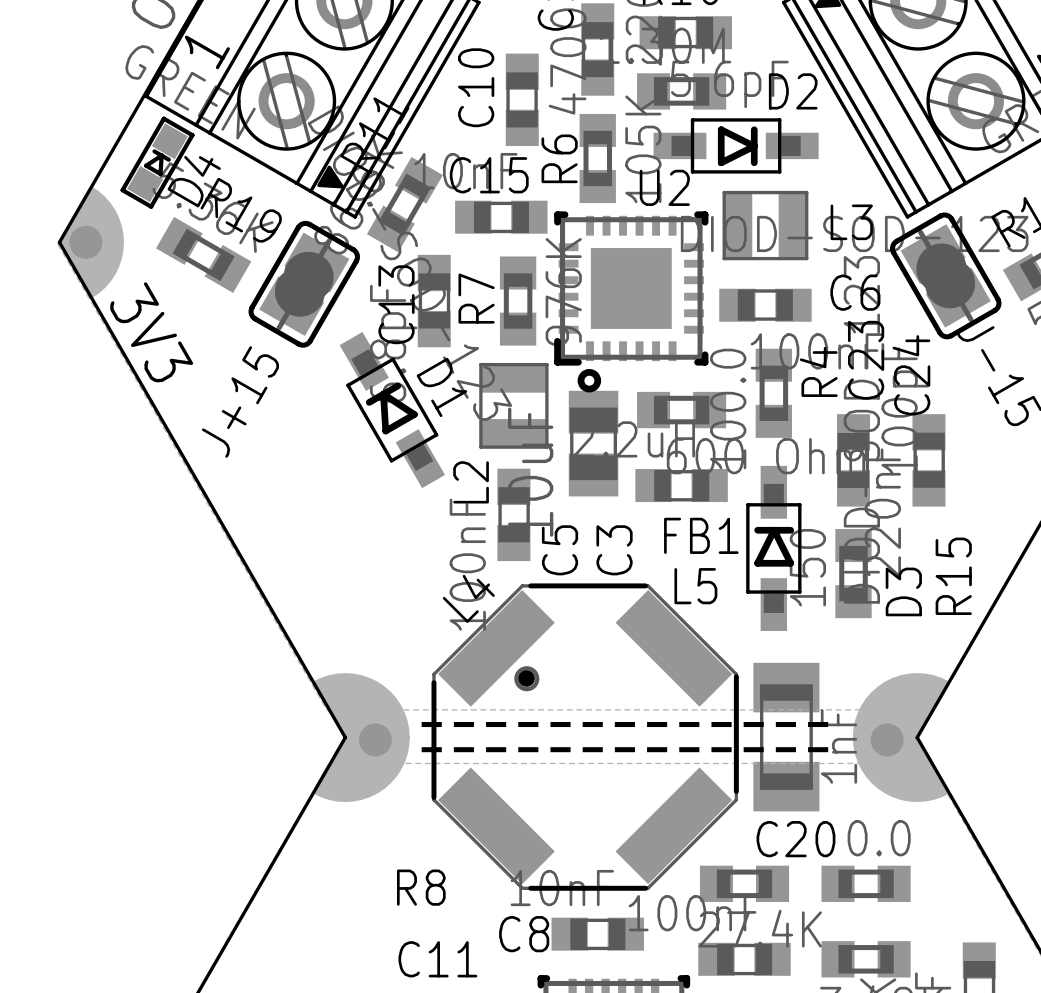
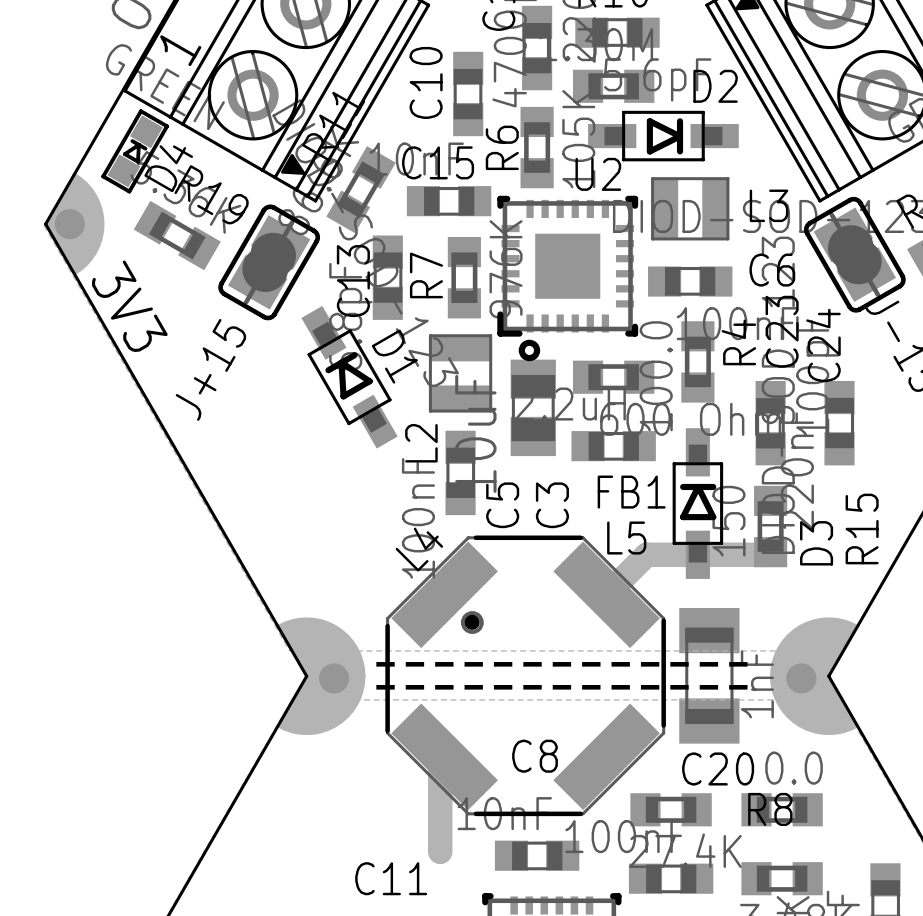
U2 footprint: [554, 211, 709, 393] -> [497, 195, 639, 362]
track: none -> (770, 552) (767, 554) (646, 554) (606, 594)
track: none -> (444, 756) (440, 761) (440, 851)
R8 name position: R8 (421, 887) -> R8 (770, 809)
C8 name position: C8 (524, 934) -> C8 (535, 756)

